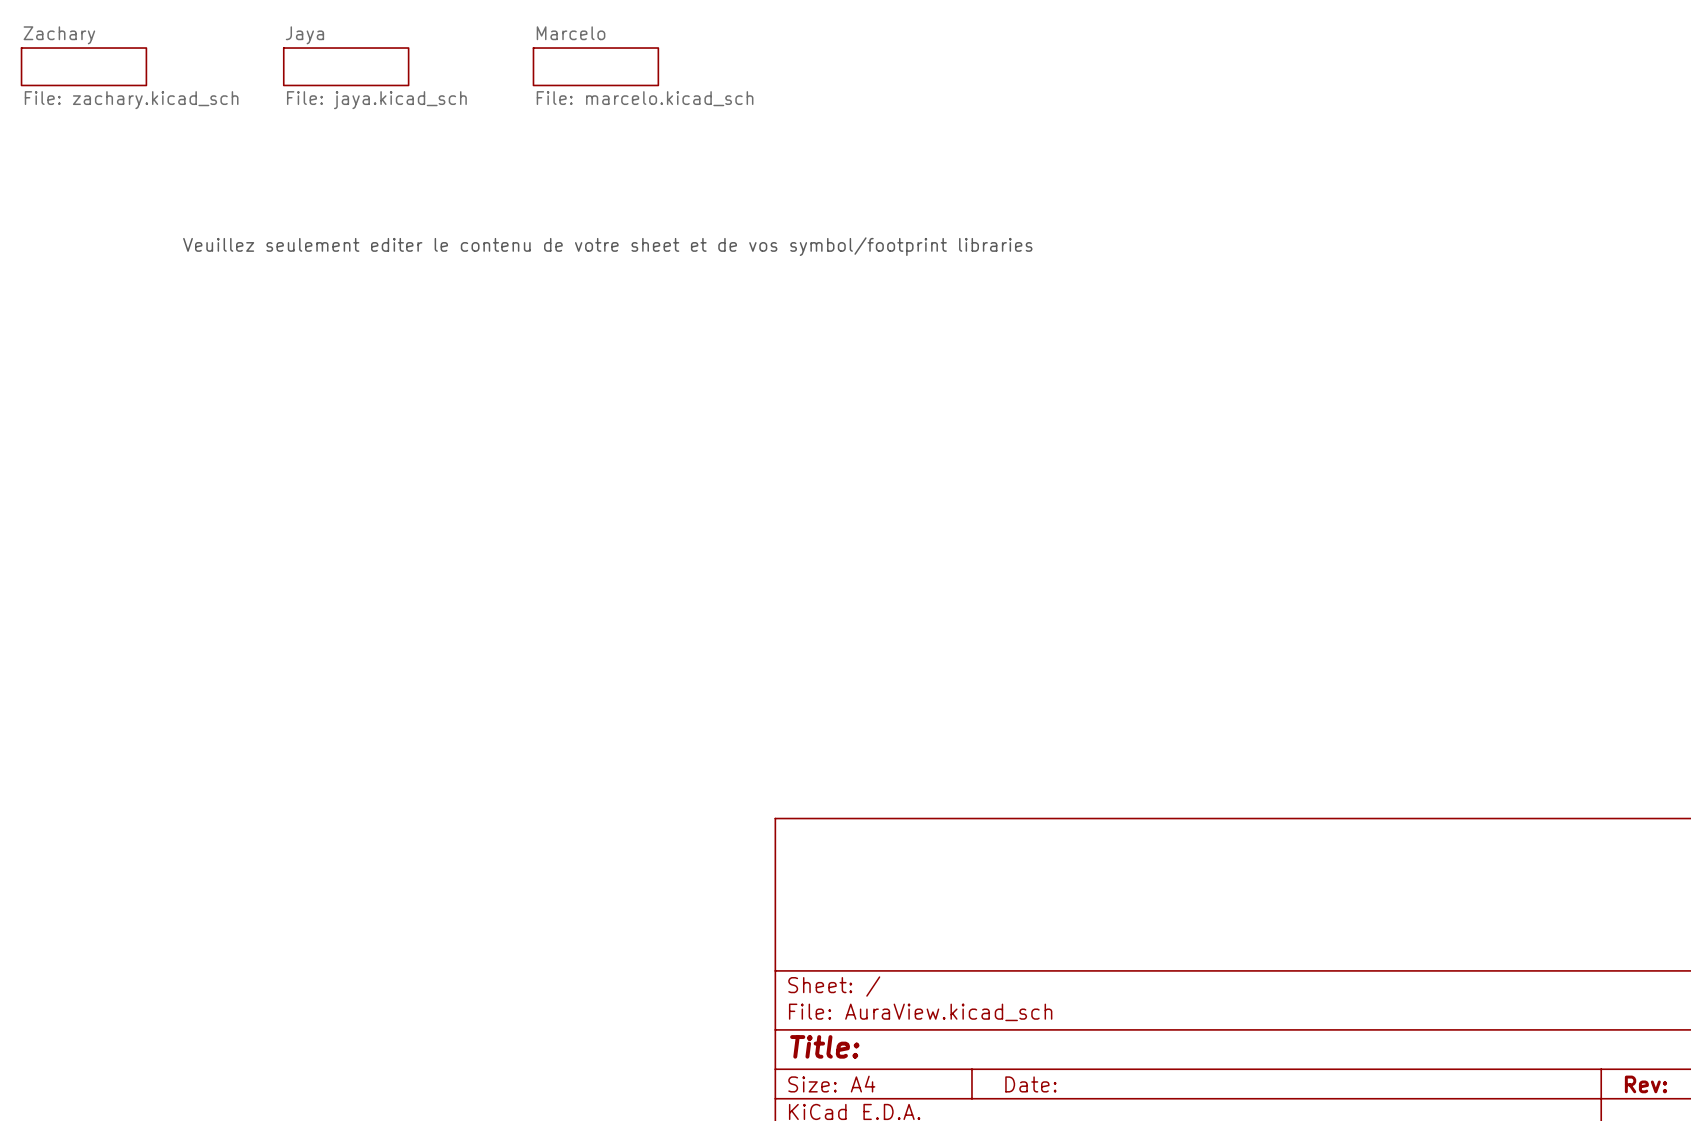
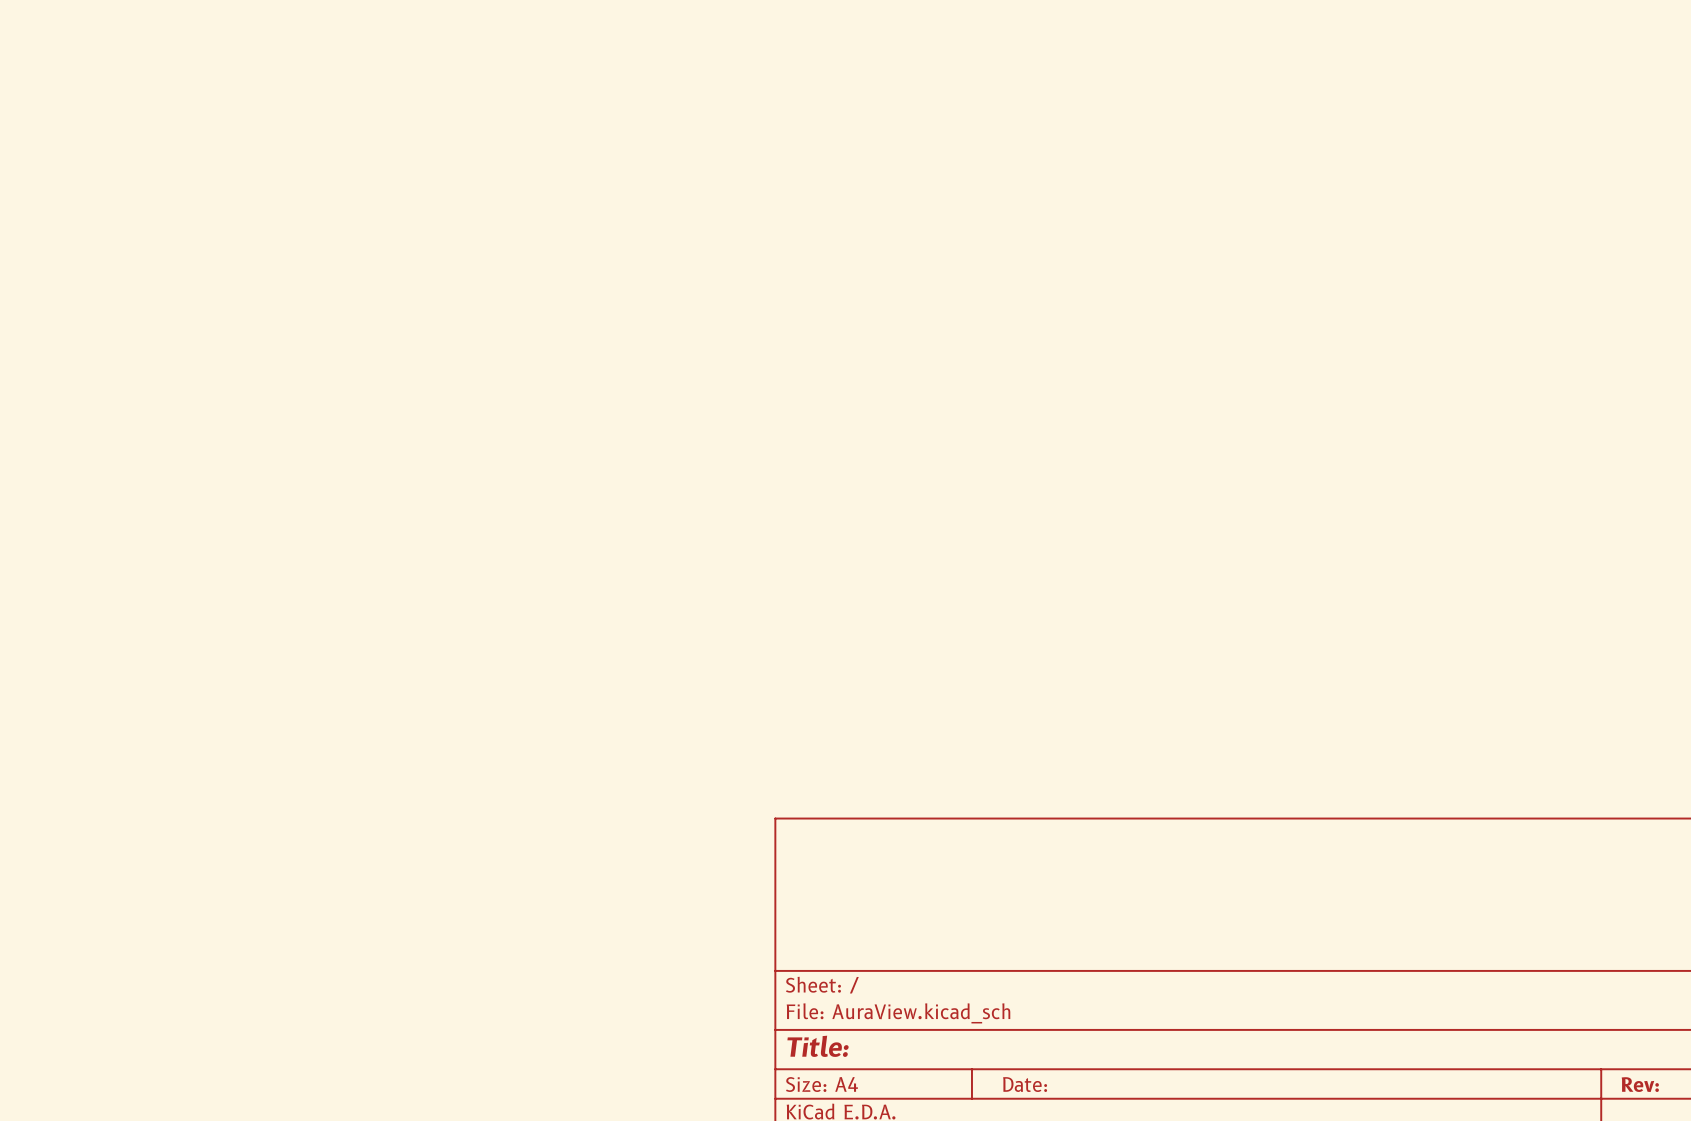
sheet Zachary: File: zachary.kicad_sch (83, 66) -> none
sheet Jaya: File: jaya.kicad_sch (346, 66) -> none
sheet Marcelo: File: marcelo.kicad_sch (595, 66) -> none
text: Veuillez seulement editer le contenu de votre sheet et de vos symbol/footprint libraries (607, 246) -> none

